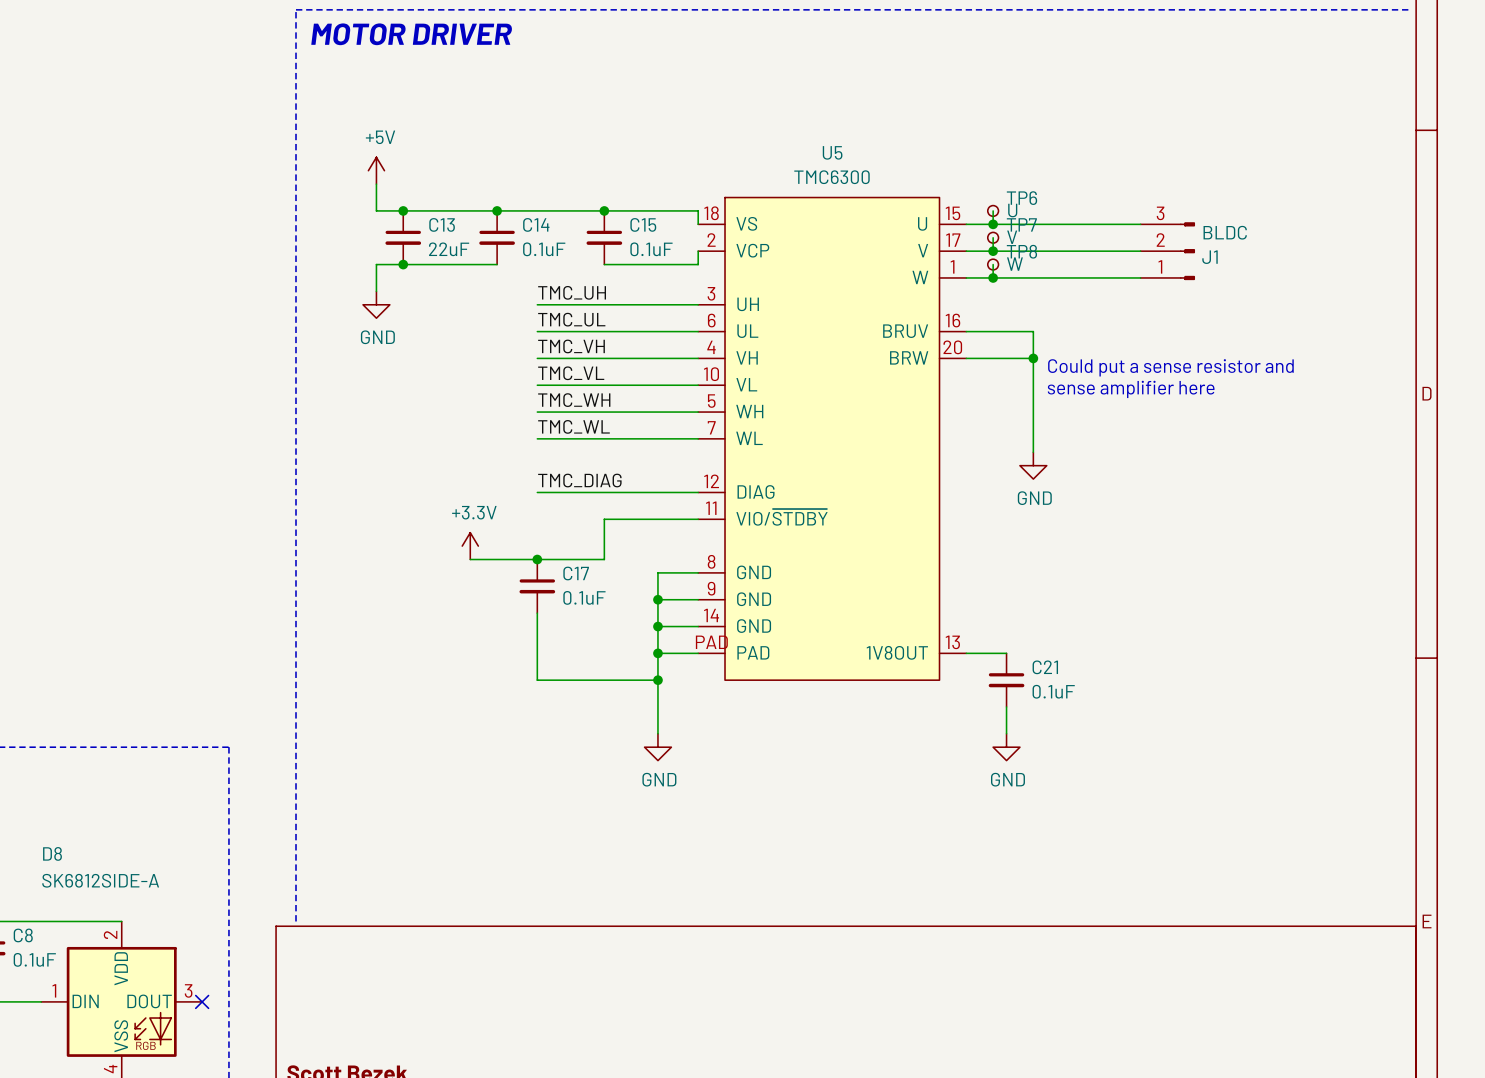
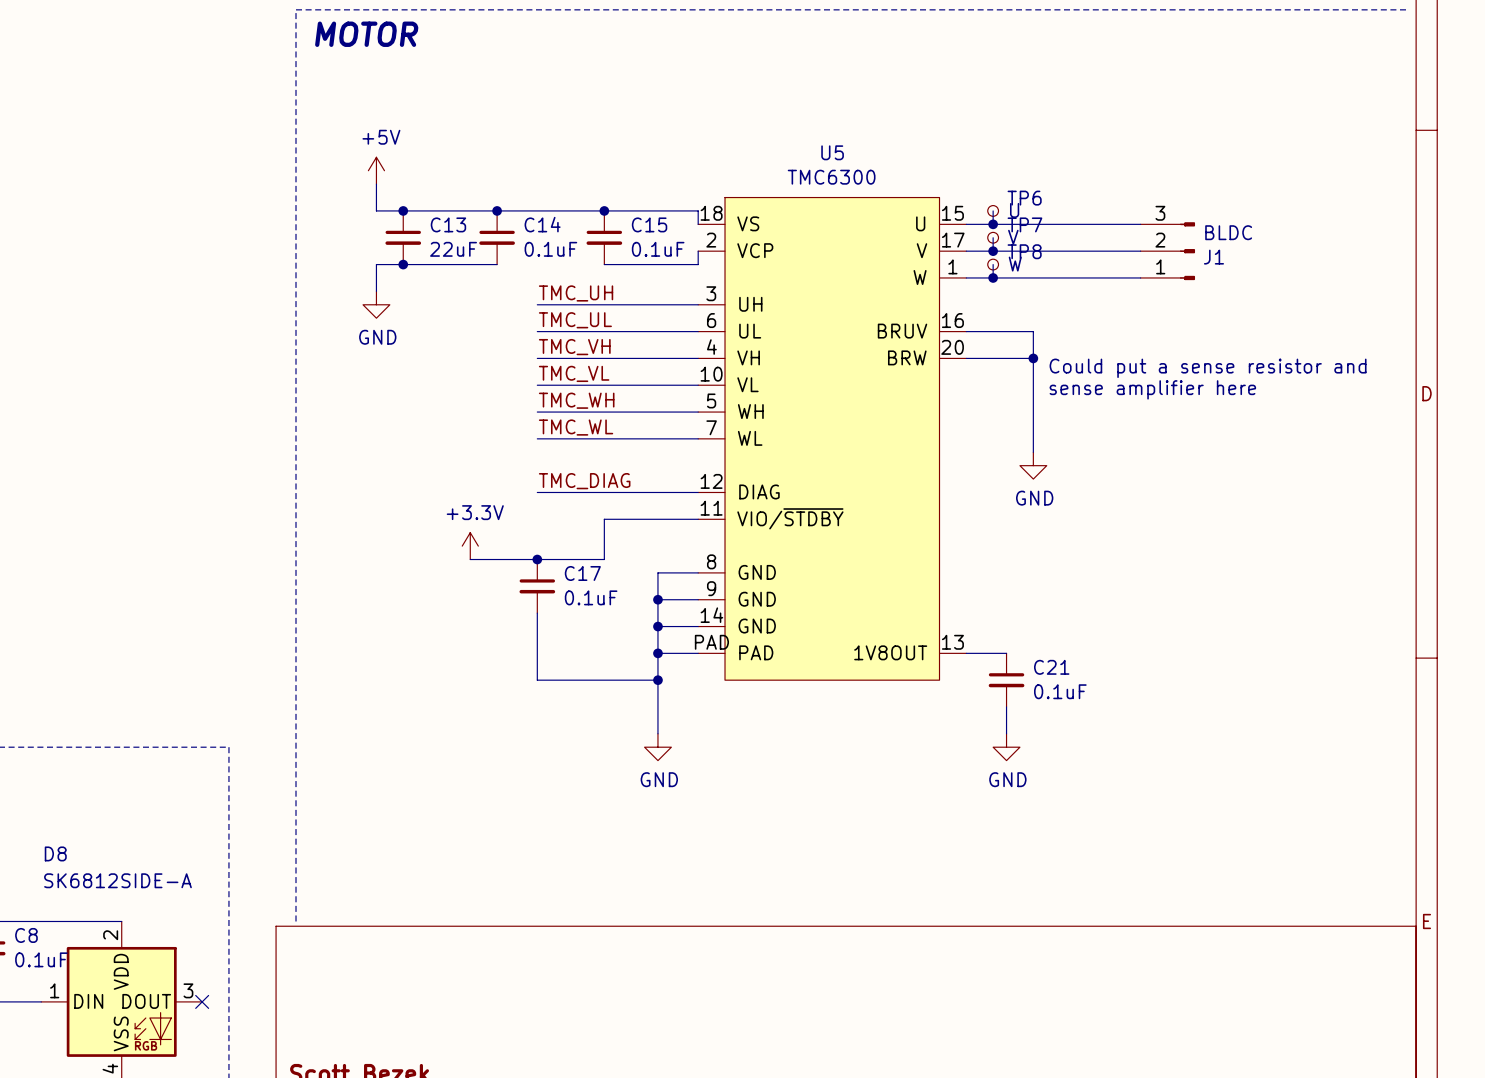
text: MOTOR DRIVER (411, 34) -> MOTOR (366, 34)

